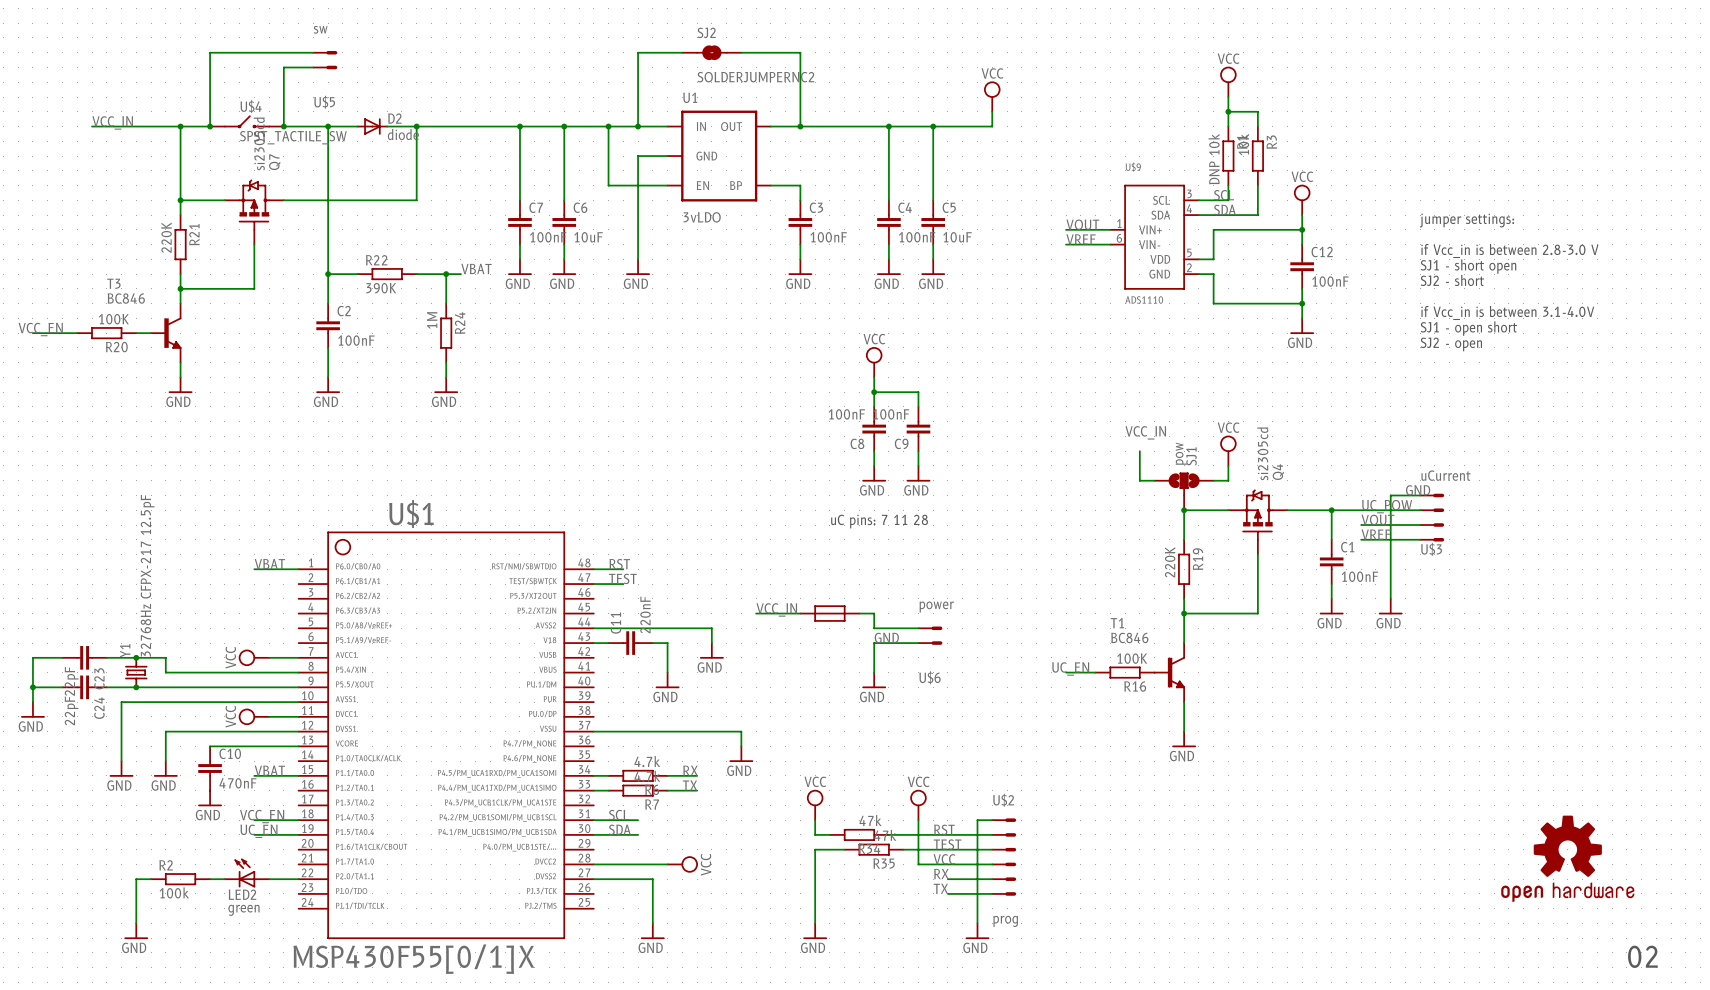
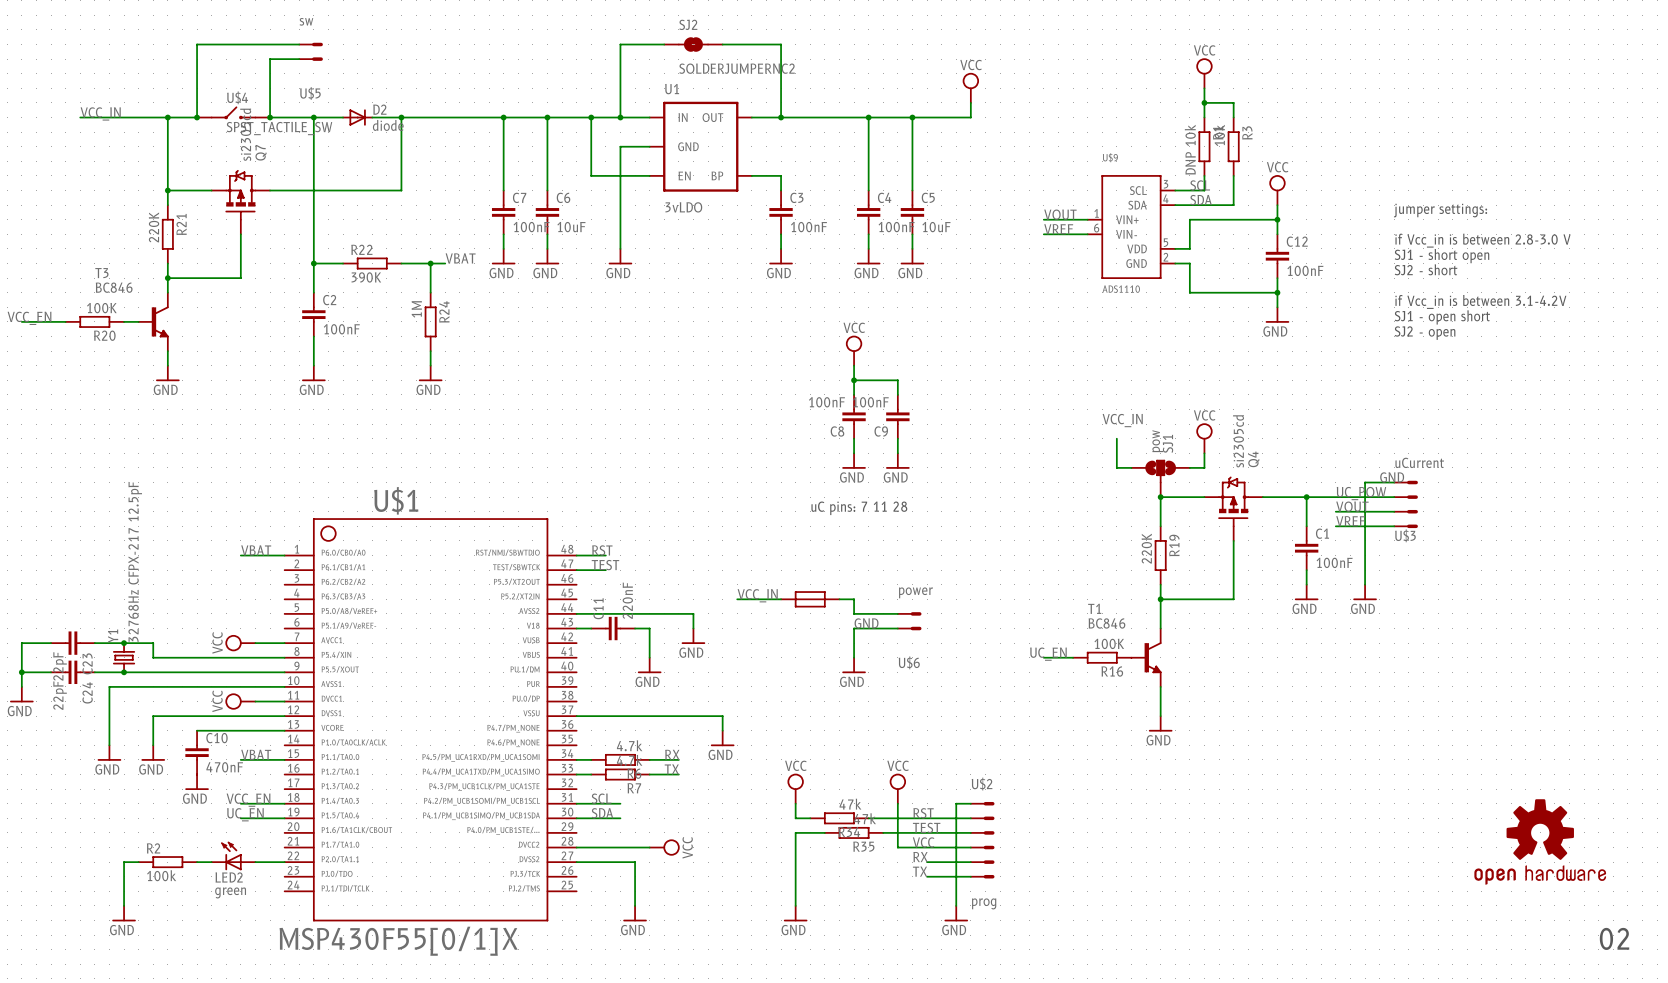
text: if Vcc_in is between 3.1-4.0V (1507, 312) -> if Vcc_in is between 3.1-4.2V (1480, 301)

